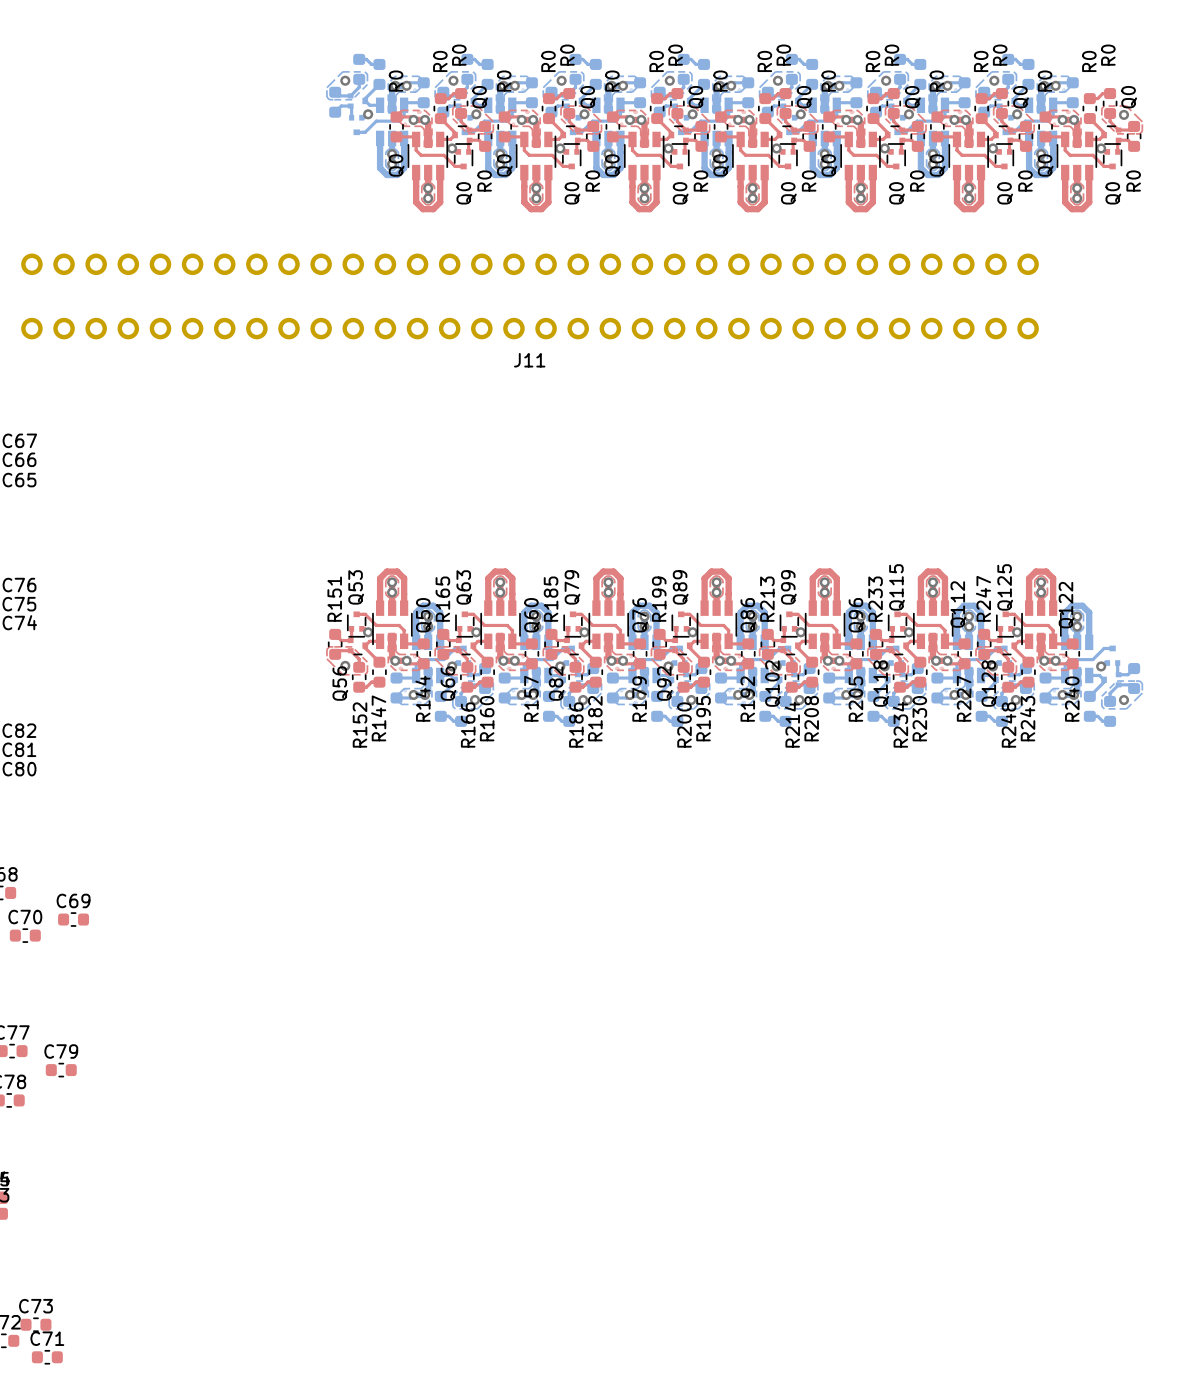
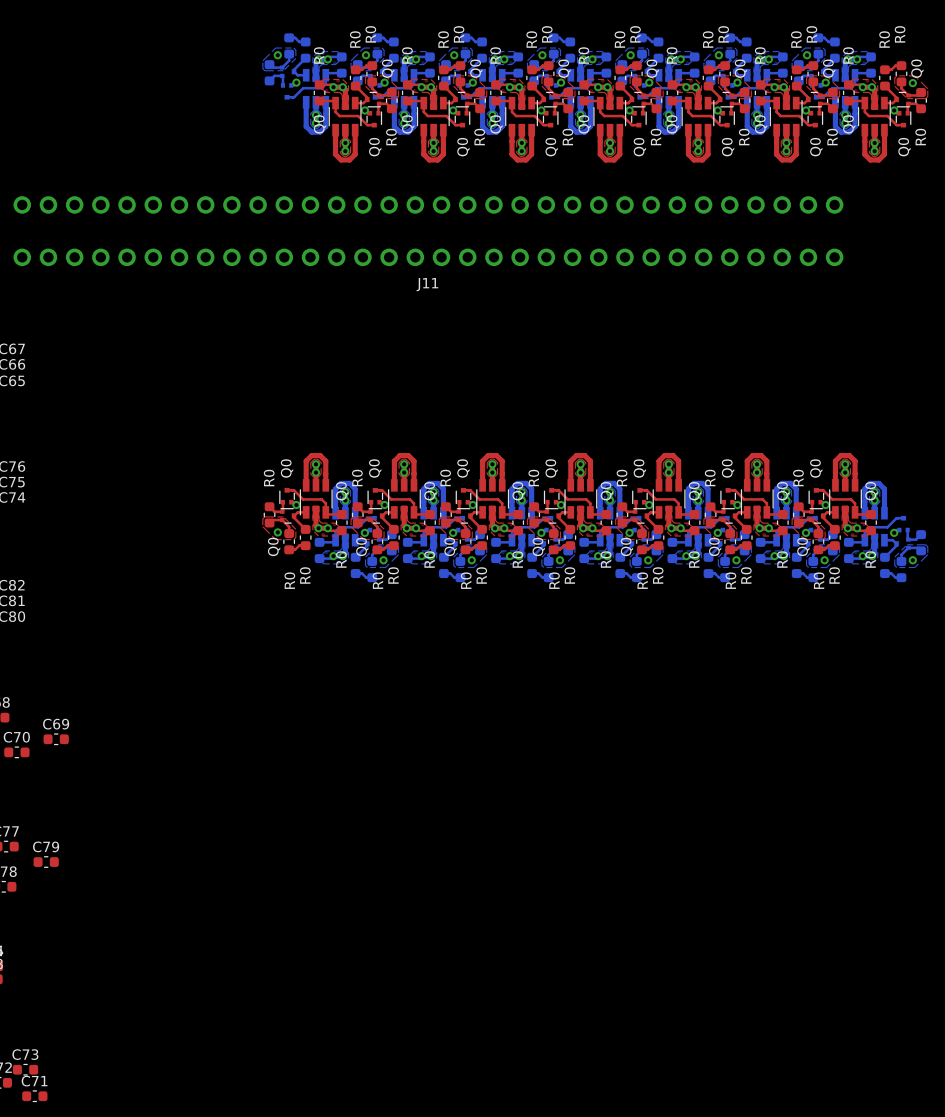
Q53 name: Q53 (356, 587) -> Q0 (287, 468)
Q63 name: Q63 (464, 587) -> Q0 (375, 468)
Q79 name: Q79 (572, 587) -> Q0 (463, 468)
Q89 name: Q89 (680, 587) -> Q0 (551, 468)
Q99 name: Q99 (788, 587) -> Q0 (639, 468)
Q115 name: Q115 (897, 587) -> Q0 (728, 468)
Q125 name: Q125 (1005, 587) -> Q0 (816, 468)
R247 name: R247 (983, 598) -> R0 (798, 478)
R151 name: R151 (334, 599) -> R0 (269, 478)
R165 name: R165 (442, 599) -> R0 (357, 478)
R185 name: R185 (551, 599) -> R0 (445, 478)
R199 name: R199 (659, 599) -> R0 (533, 478)
R213 name: R213 (767, 599) -> R0 (622, 478)
R233 name: R233 (875, 599) -> R0 (710, 478)
Q112 name: Q112 (958, 604) -> Q0 (783, 491)
Q122 name: Q122 (1066, 605) -> Q0 (871, 491)
Q50 name: Q50 (423, 615) -> Q0 (342, 491)
Q60 name: Q60 (532, 615) -> Q0 (430, 491)
Q76 name: Q76 (640, 615) -> Q0 (518, 491)
Q86 name: Q86 (748, 615) -> Q0 (606, 491)
Q96 name: Q96 (856, 615) -> Q0 (695, 491)
Q56 name: Q56 (340, 683) -> Q0 (274, 546)
Q66 name: Q66 (448, 683) -> Q0 (362, 546)
Q82 name: Q82 (556, 683) -> Q0 (450, 546)
Q92 name: Q92 (664, 683) -> Q0 (538, 546)
Q102 name: Q102 (773, 683) -> Q0 (626, 546)
Q118 name: Q118 (881, 683) -> Q0 (715, 546)
Q128 name: Q128 (989, 683) -> Q0 (803, 546)
R144 name: R144 (422, 698) -> R0 (341, 559)
R157 name: R157 (531, 698) -> R0 (429, 559)
R227 name: R227 (964, 698) -> R0 (782, 559)
R179 name: R179 (639, 699) -> R0 (517, 559)
R192 name: R192 (747, 699) -> R0 (606, 559)
R205 name: R205 (855, 699) -> R0 (694, 559)
R240 name: R240 (1071, 699) -> R0 (870, 559)
R147 name: R147 (378, 718) -> R0 (305, 575)
R160 name: R160 (487, 718) -> R0 (393, 575)
R182 name: R182 (595, 718) -> R0 (481, 575)
R195 name: R195 (703, 718) -> R0 (569, 575)
R208 name: R208 (811, 718) -> R0 (658, 575)
R230 name: R230 (919, 718) -> R0 (746, 575)
R243 name: R243 (1027, 718) -> R0 (834, 575)
R214 name: R214 (792, 724) -> R0 (642, 580)
R234 name: R234 (900, 724) -> R0 (730, 580)
R152 name: R152 (360, 725) -> R0 (289, 580)
R166 name: R166 (468, 725) -> R0 (378, 580)
R186 name: R186 (576, 725) -> R0 (466, 580)
R200 name: R200 (684, 725) -> R0 (554, 580)
R248 name: R248 (1008, 725) -> R0 (819, 580)

